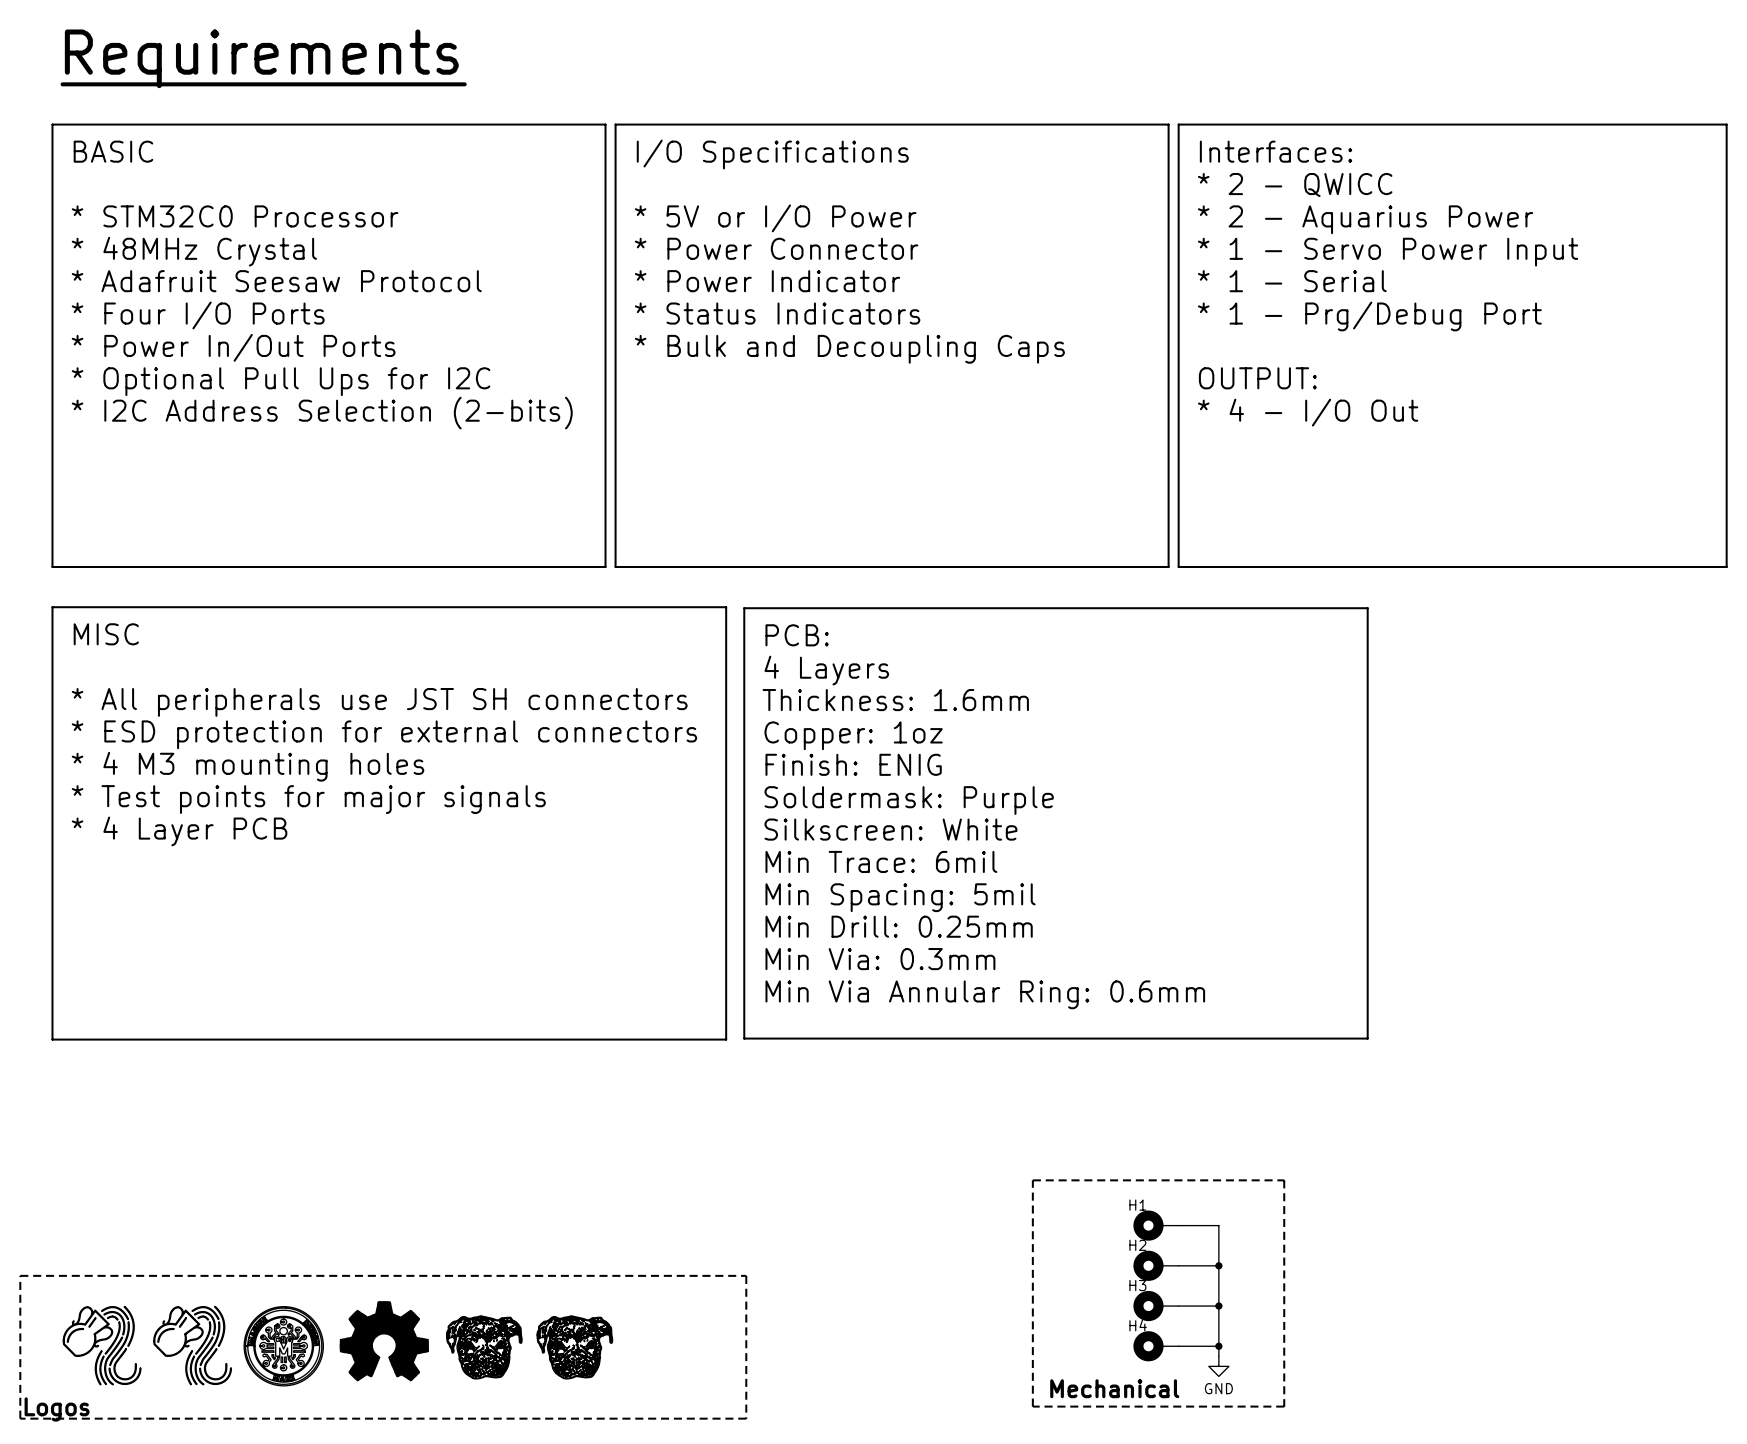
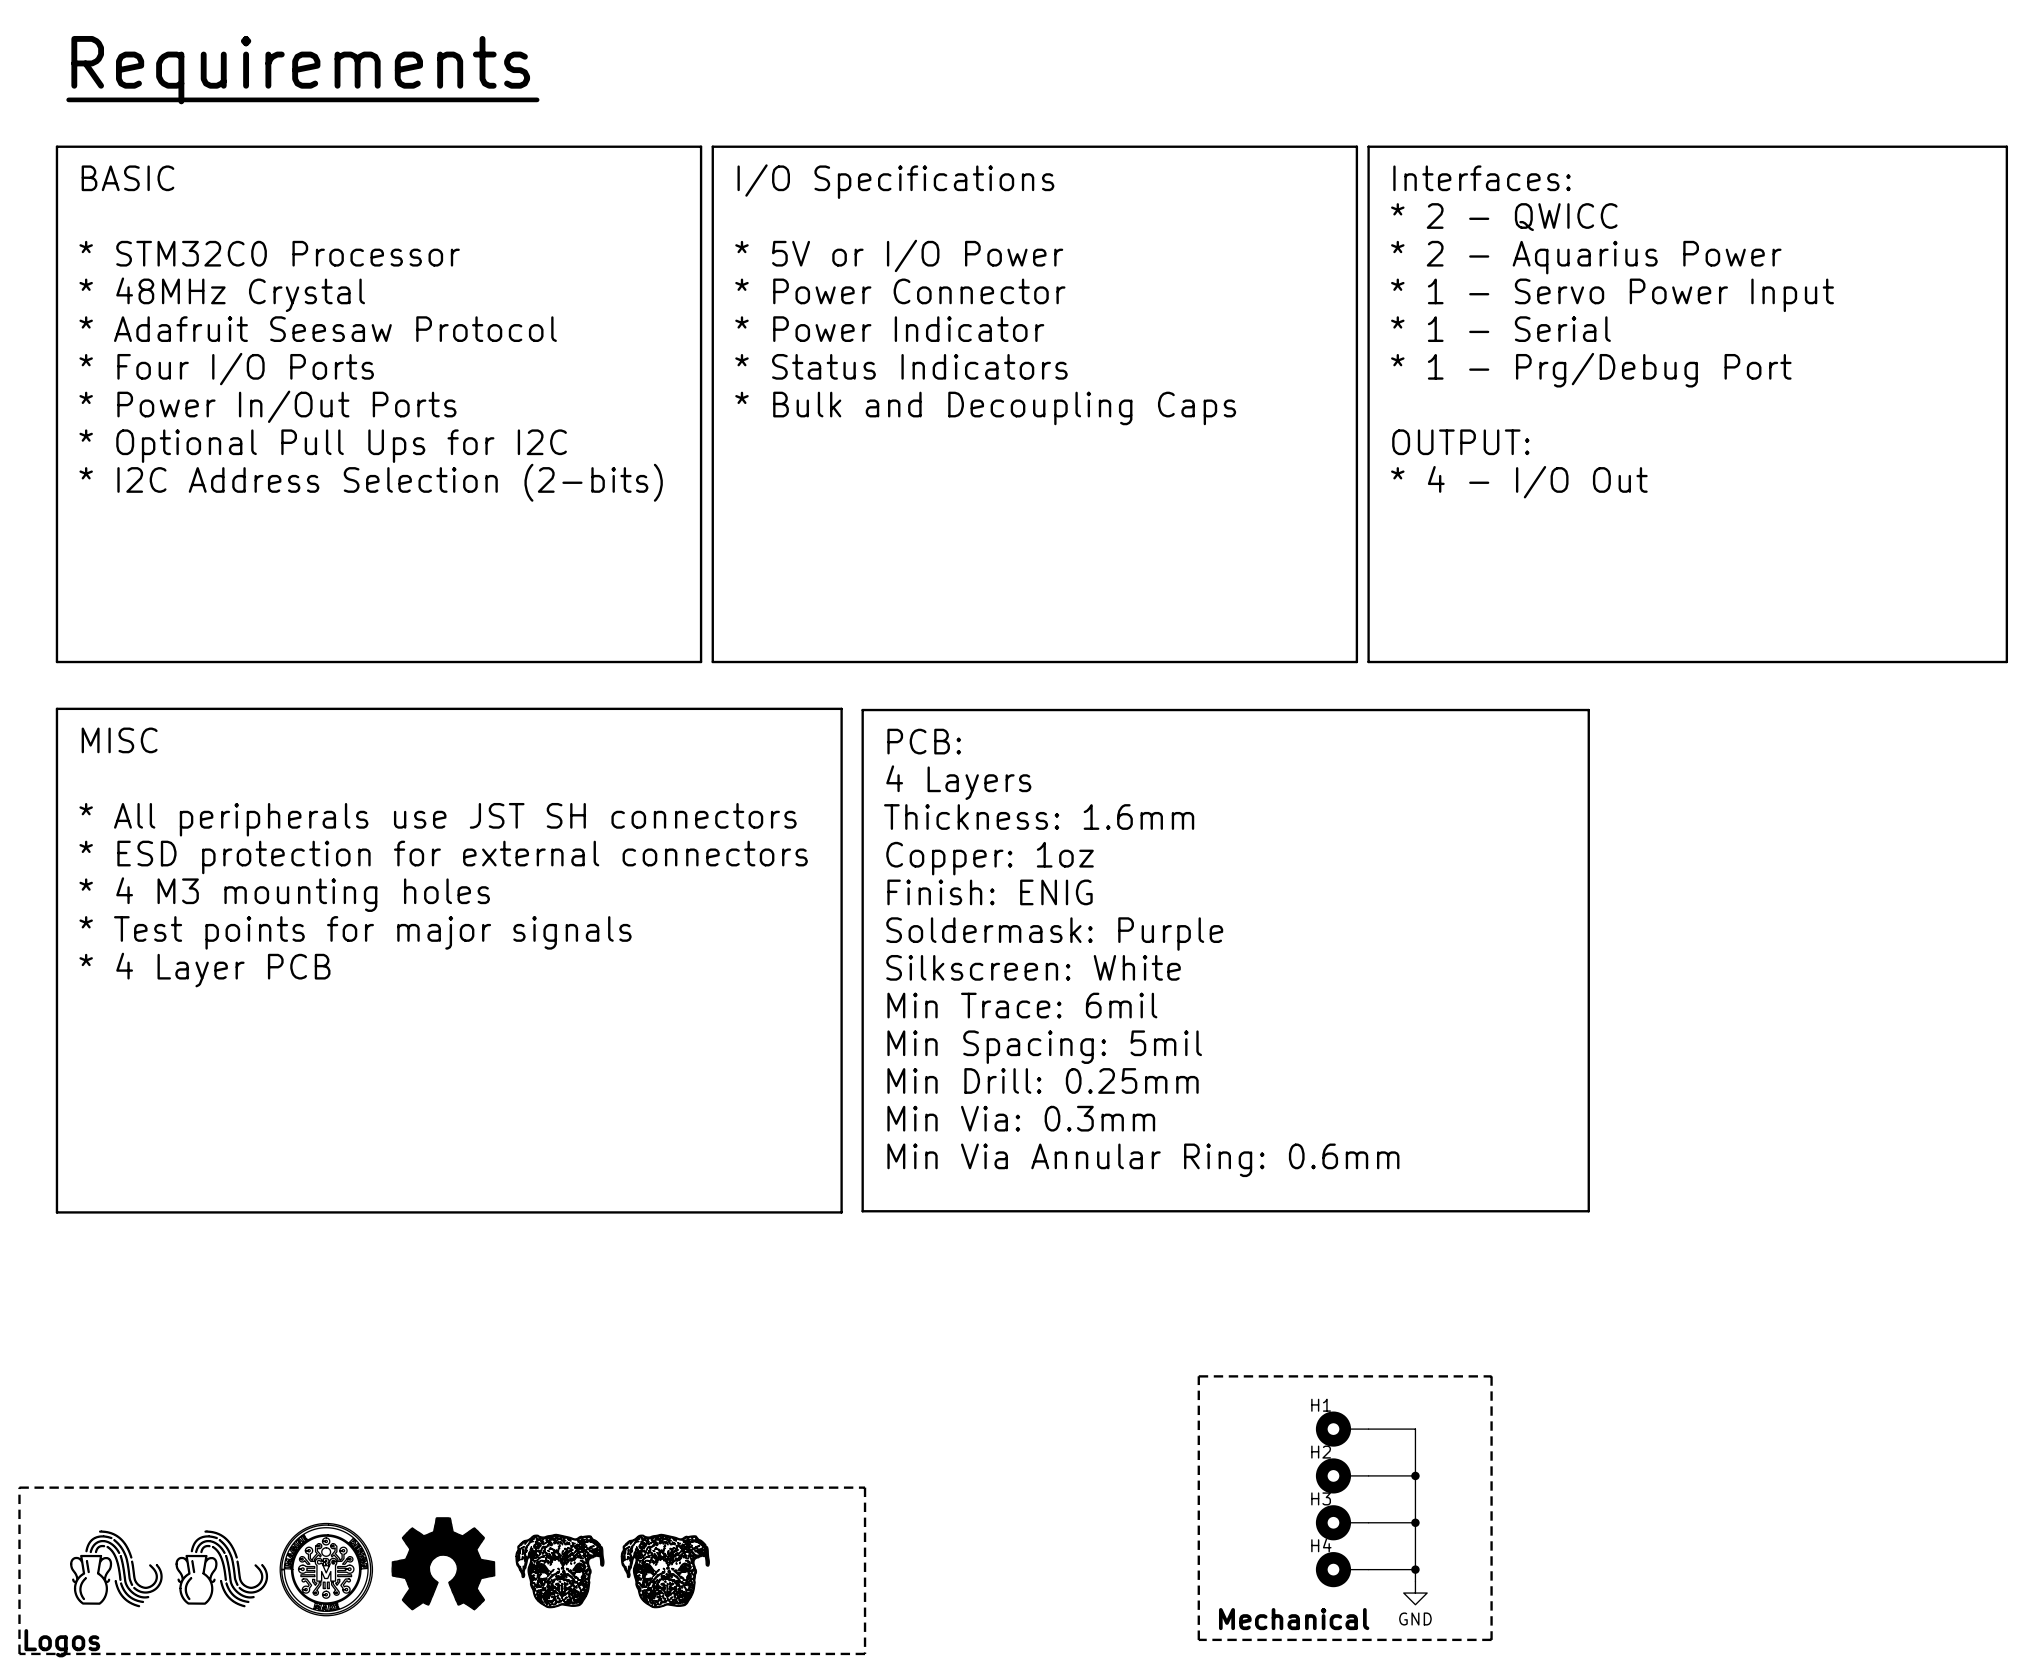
part symbol: [63, 1306, 141, 1385] -> [70, 1530, 163, 1607]
part symbol: [153, 1306, 232, 1385] -> [175, 1530, 268, 1607]

